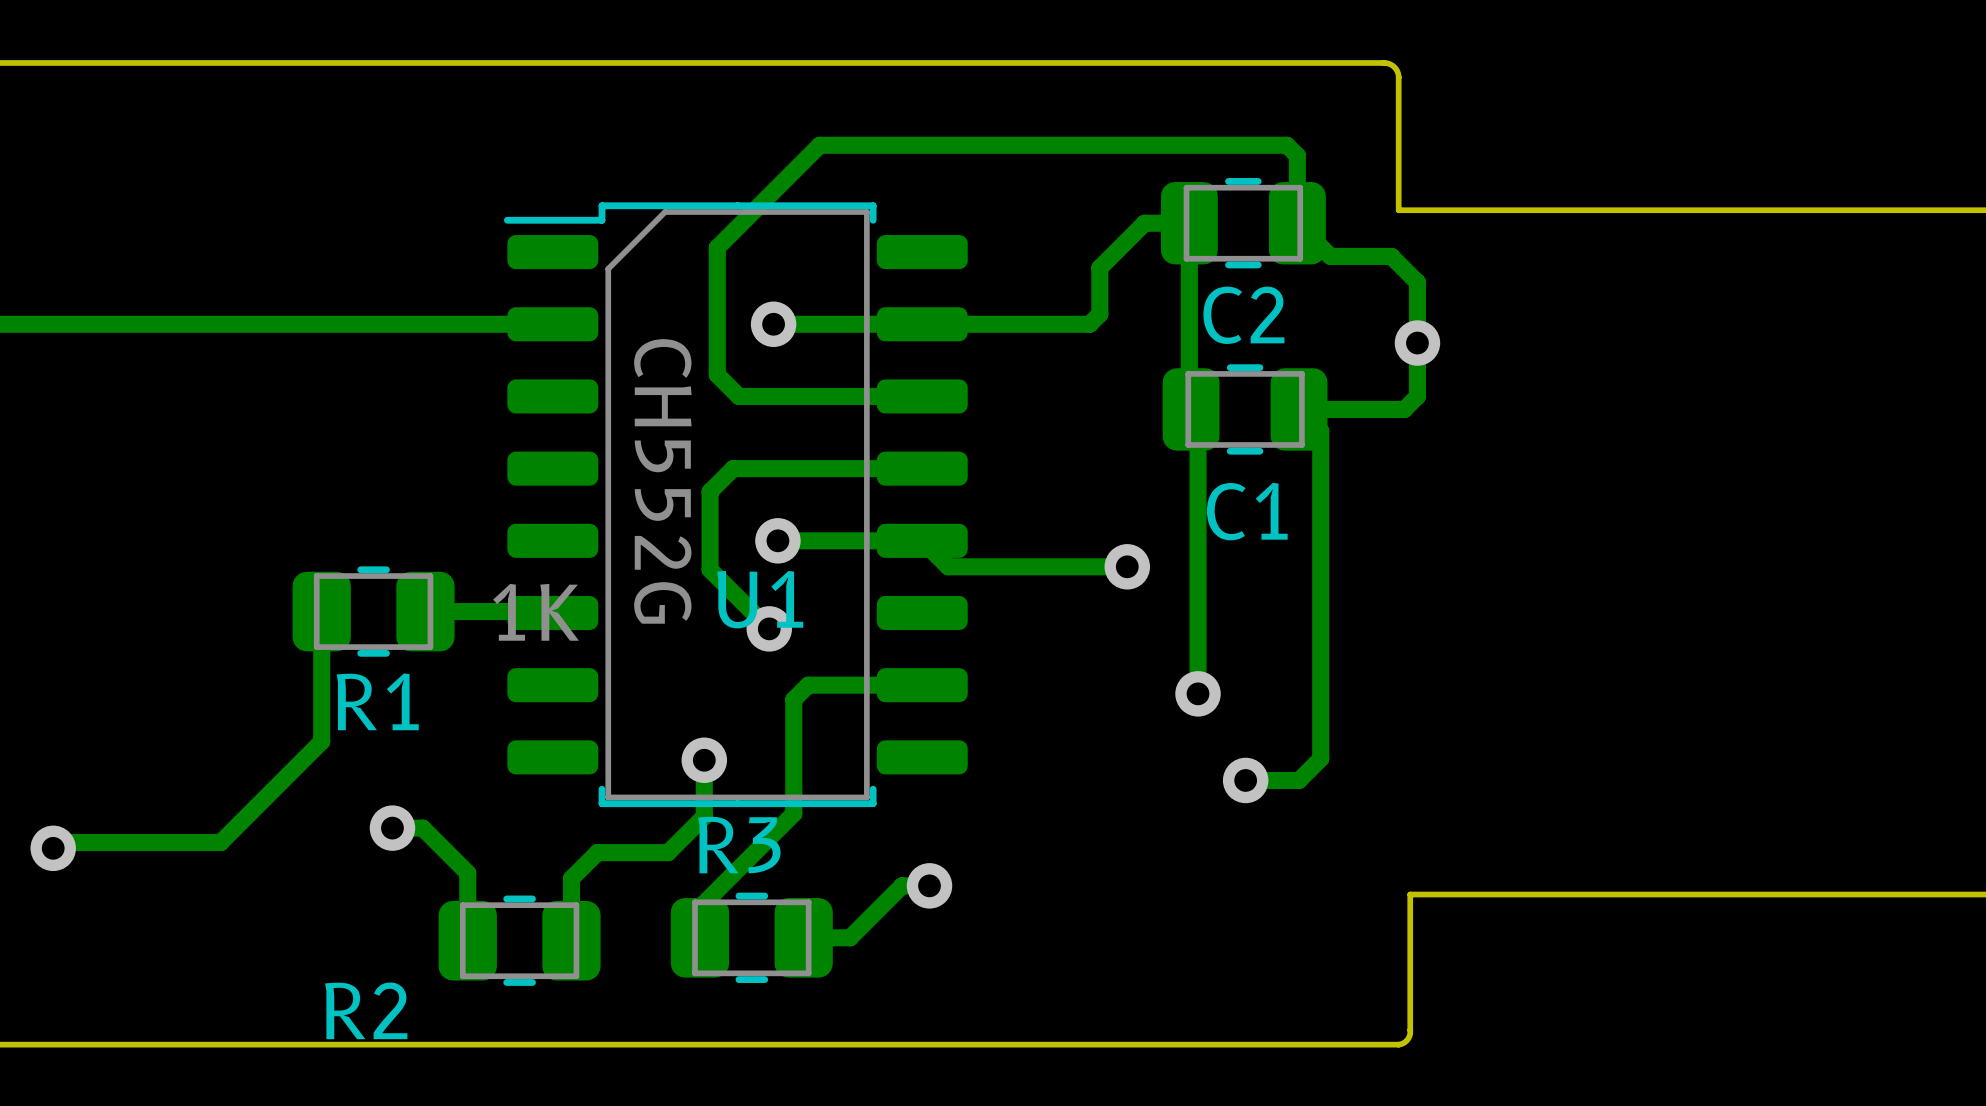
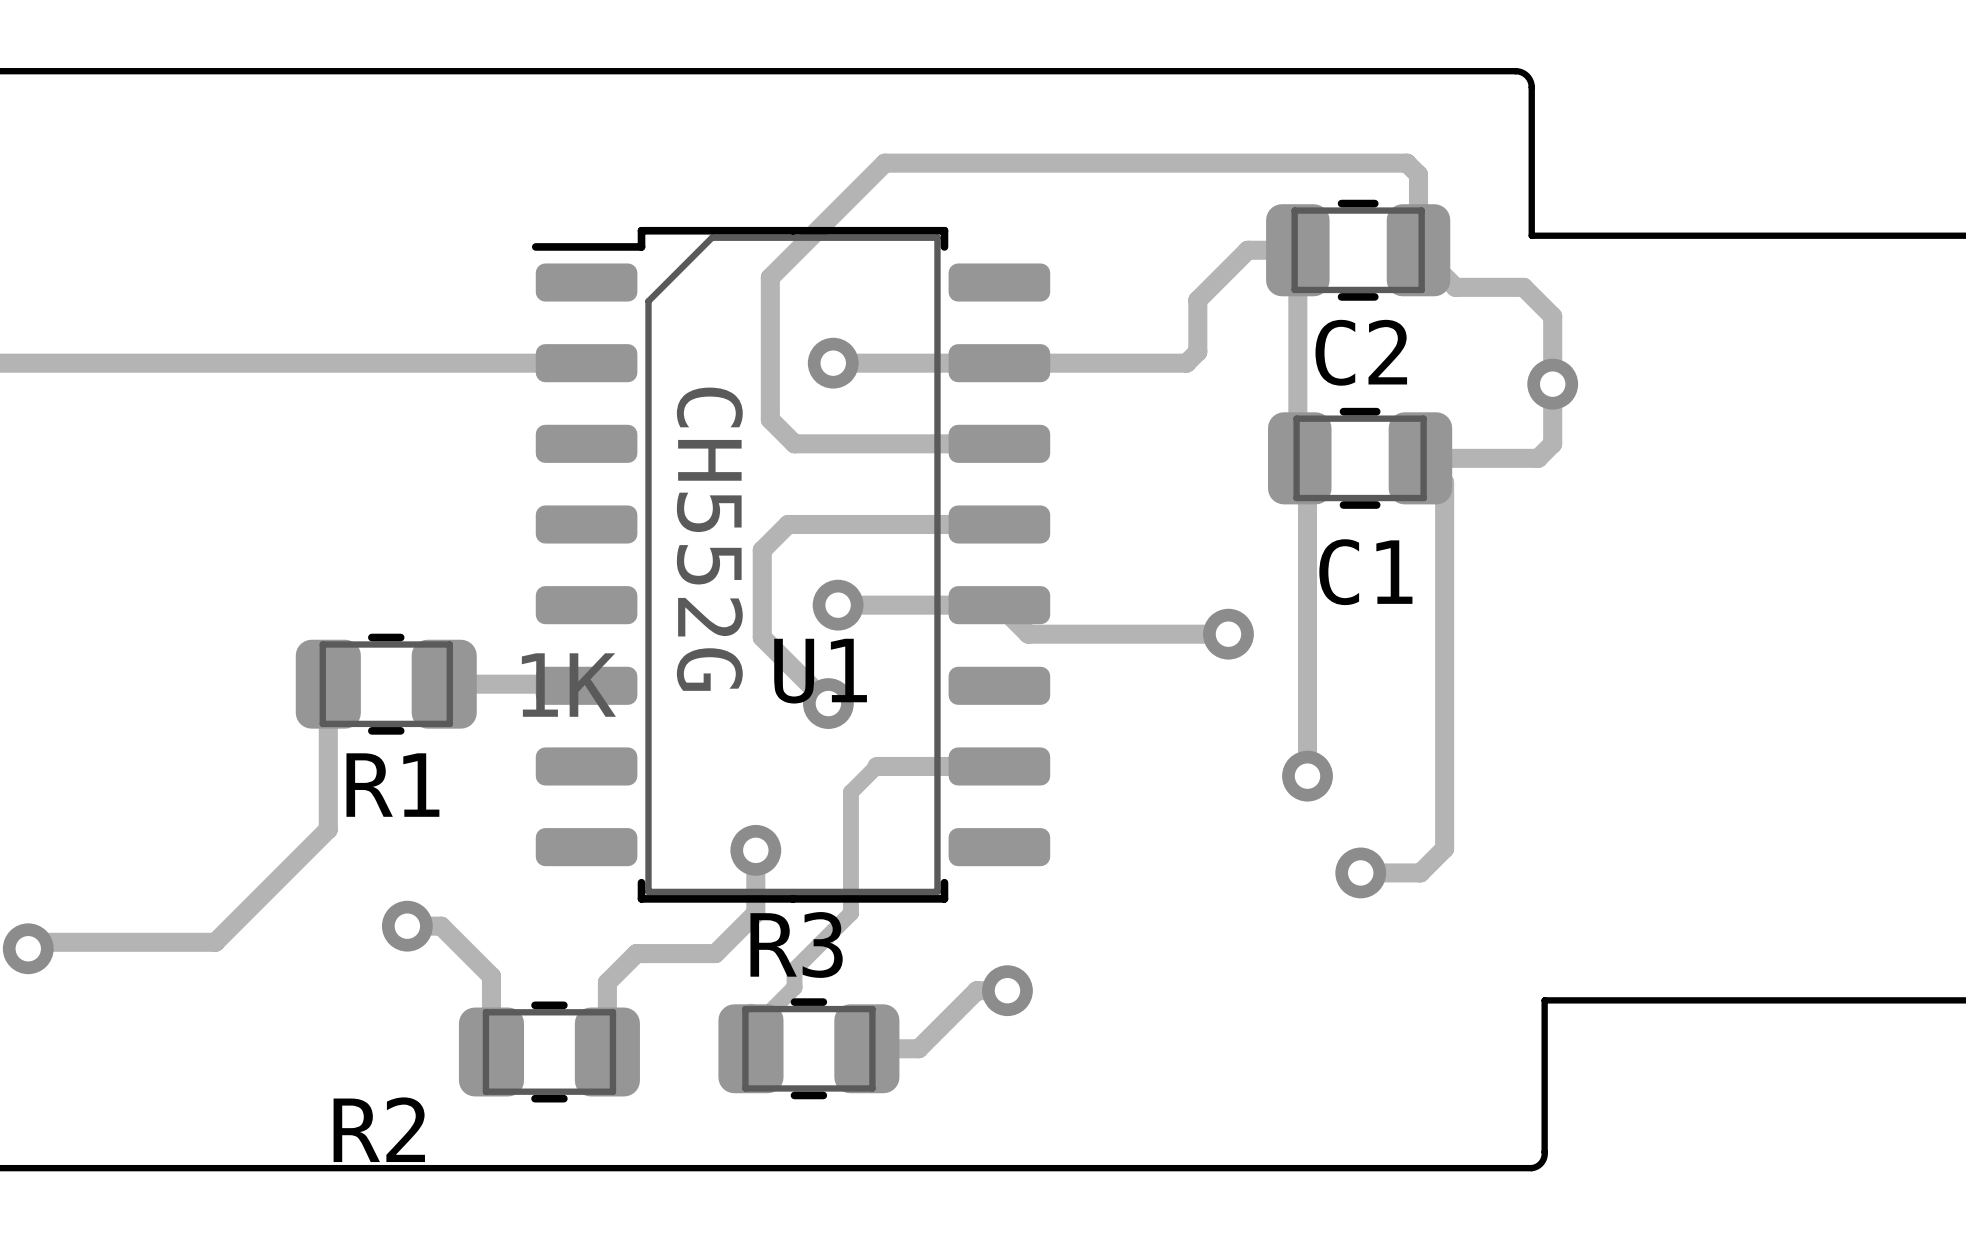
track: (812, 685) (808, 685) (793, 699) (793, 813) (699, 907) -> (876, 766) (850, 792) (850, 913) (794, 969) (794, 987) (750, 1031)

